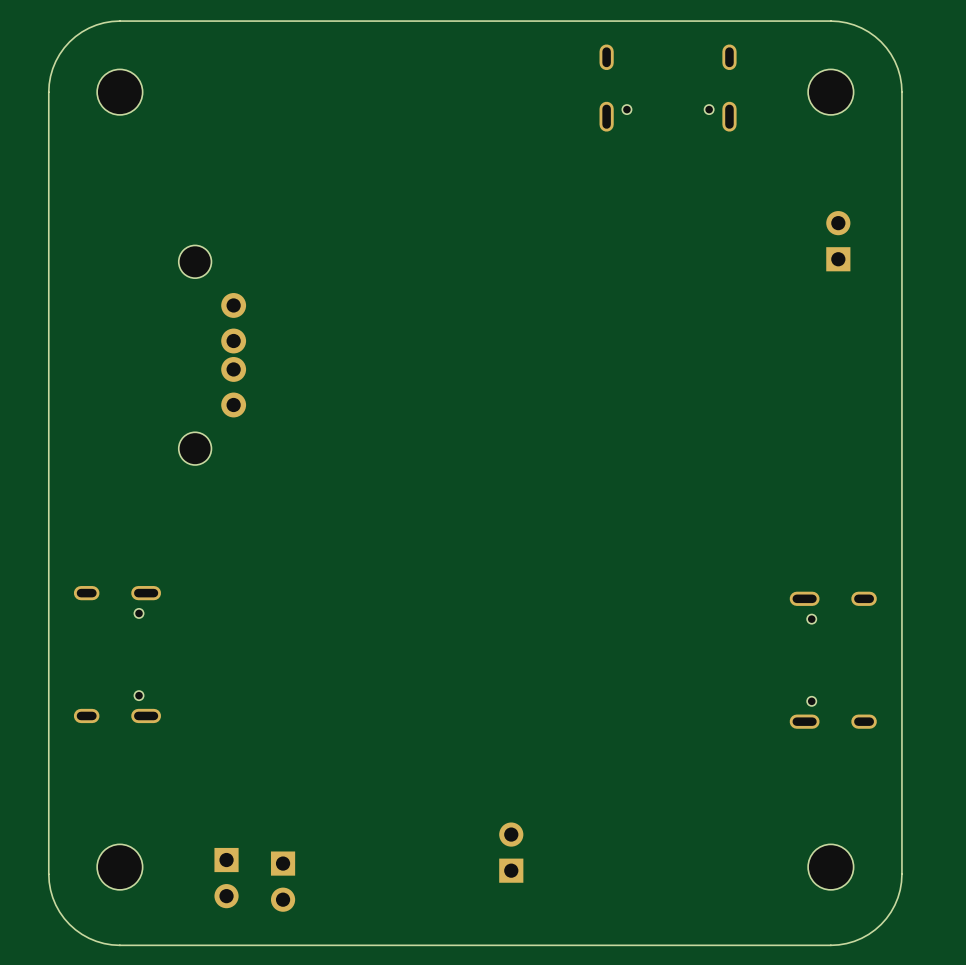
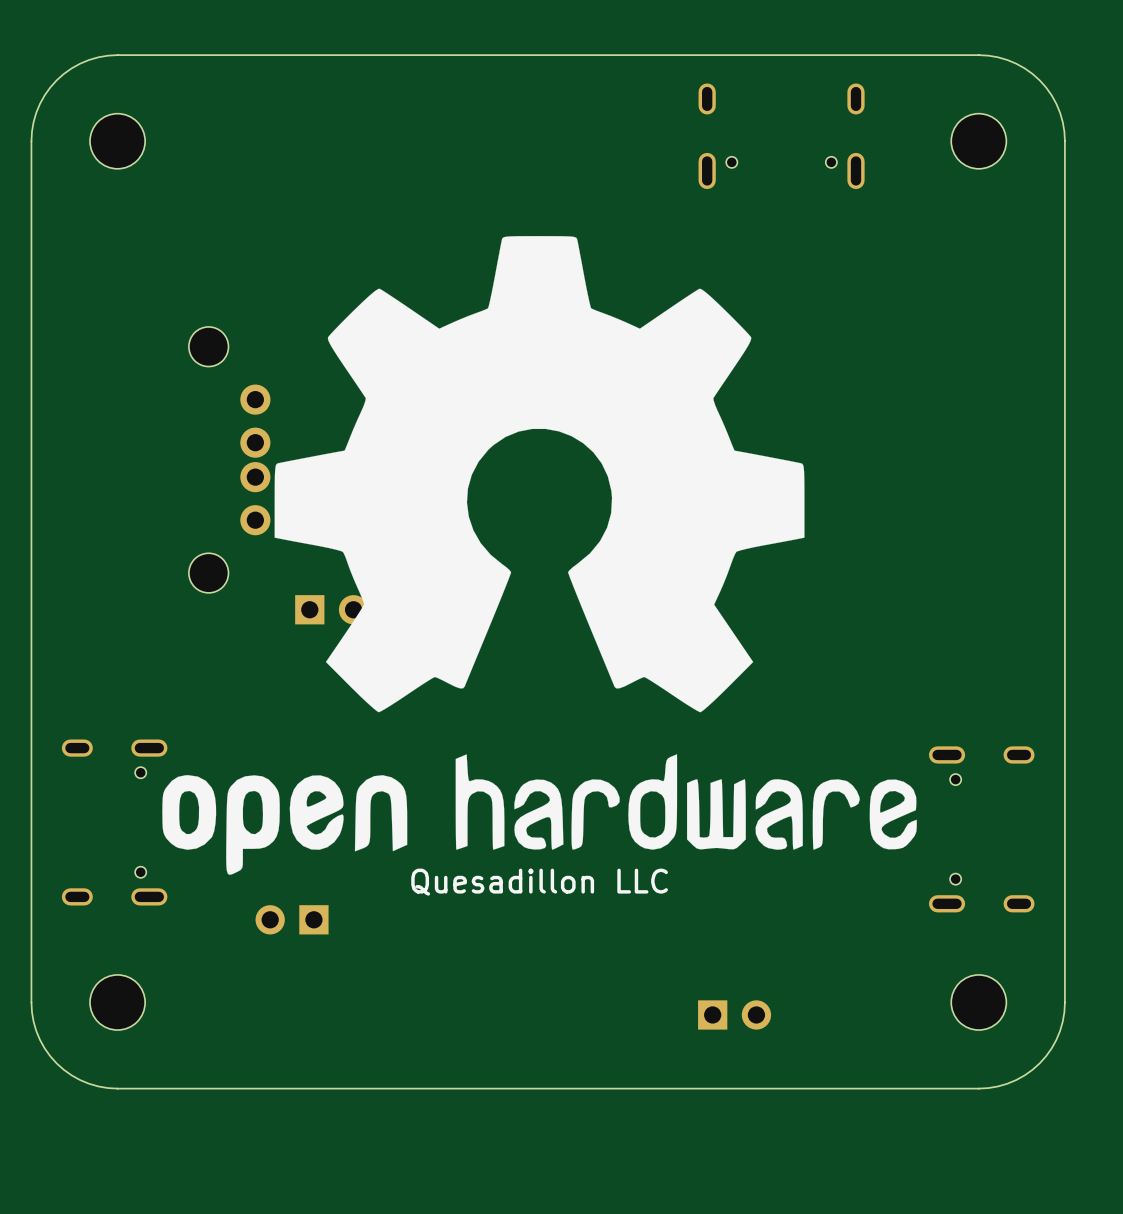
drawing: none -> [162, 236, 917, 875]
part: (838, 241) -> none
part: none -> (331, 609)
text: none -> Quesadillon LLC (539, 882)
part: none -> (292, 919)
board edge: (901, 803) (901, 882) (894, 905) (881, 924) (868, 934) (854, 941) (830, 945) (119, 945) (104, 943) (89, 938) (75, 929) (59, 912) (52, 897) (48, 874) (48, 803) -> (1064, 1002) (1062, 1021) (1056, 1039) (1039, 1063) (1024, 1075) (1007, 1083) (978, 1088) (107, 1088) (80, 1080) (63, 1069) (50, 1056) (36, 1030) (31, 1002)
part rotation: 0° (511, 852) -> 90° clockwise (734, 1014)
part position: (511, 852) -> (734, 1014)
part position: (119, 867) -> (117, 1002)
part position: (830, 867) -> (978, 1002)
part: (226, 878) -> none
part: (283, 881) -> none

